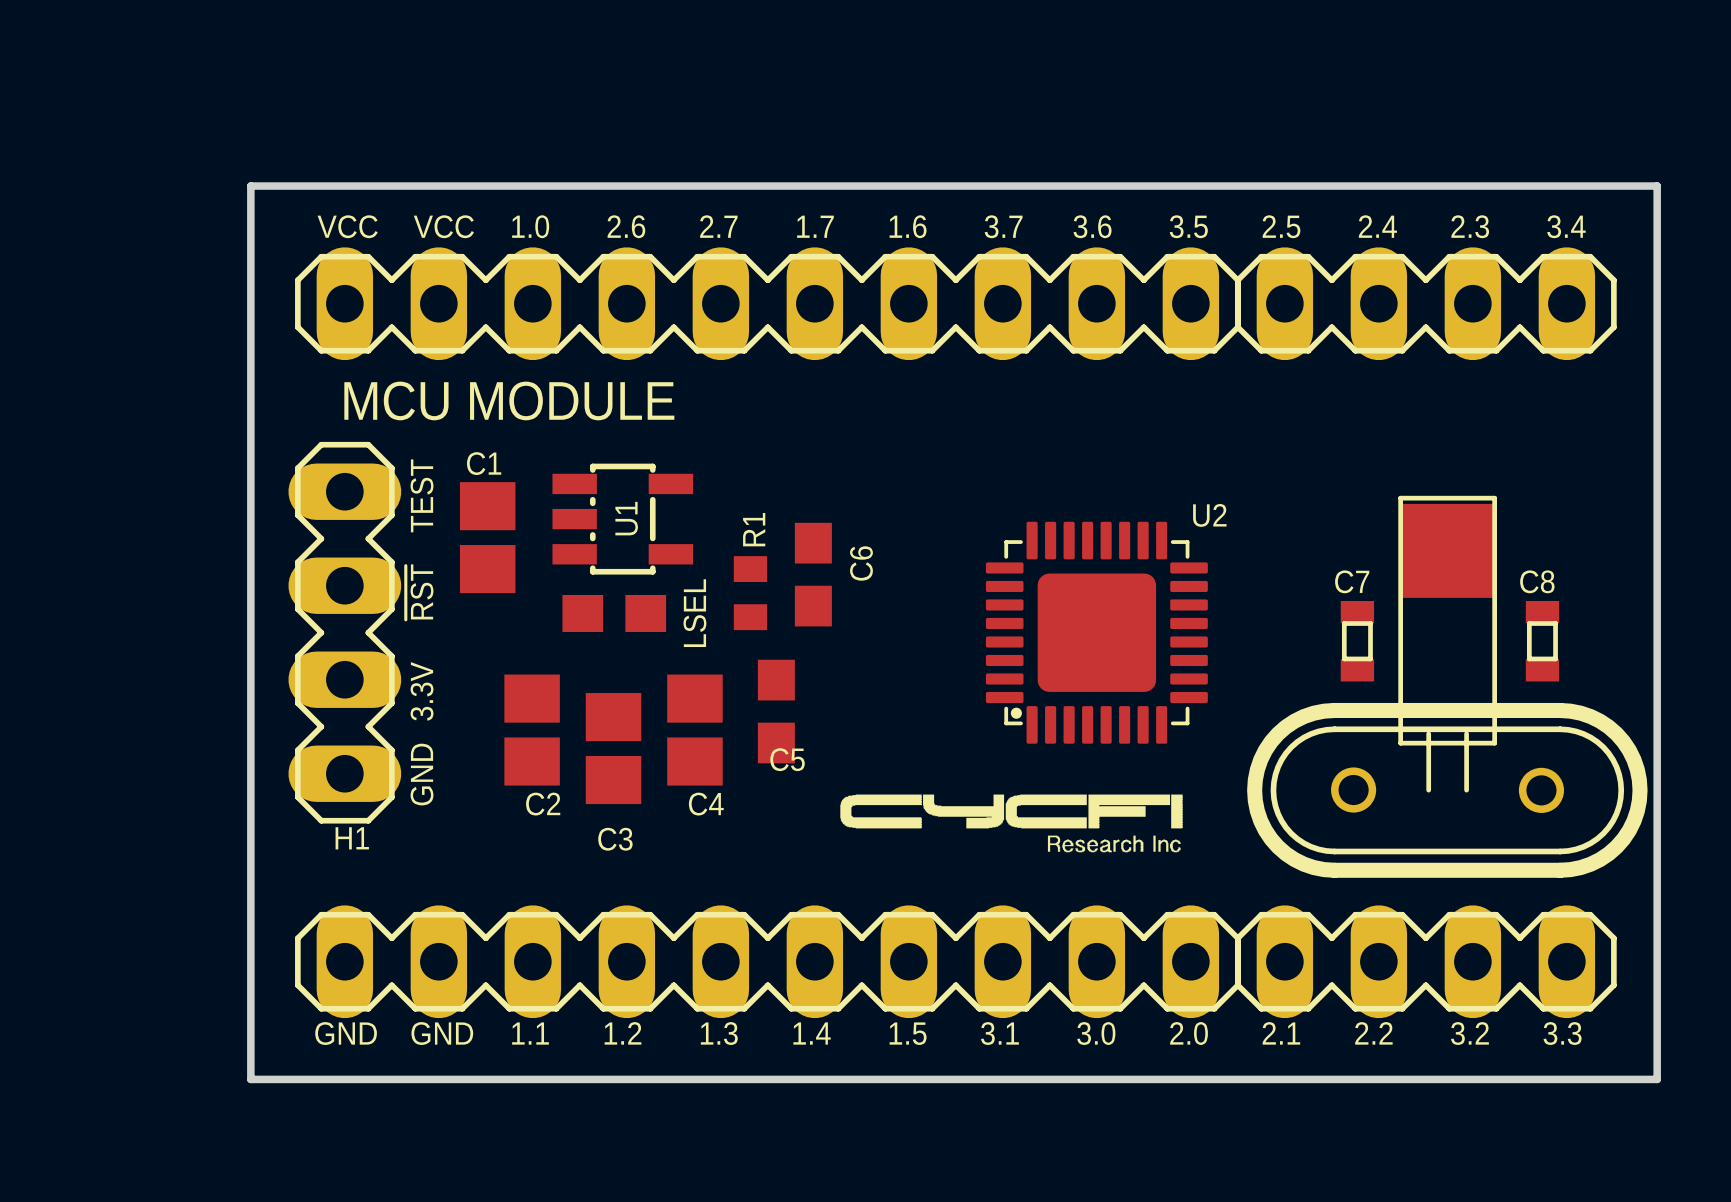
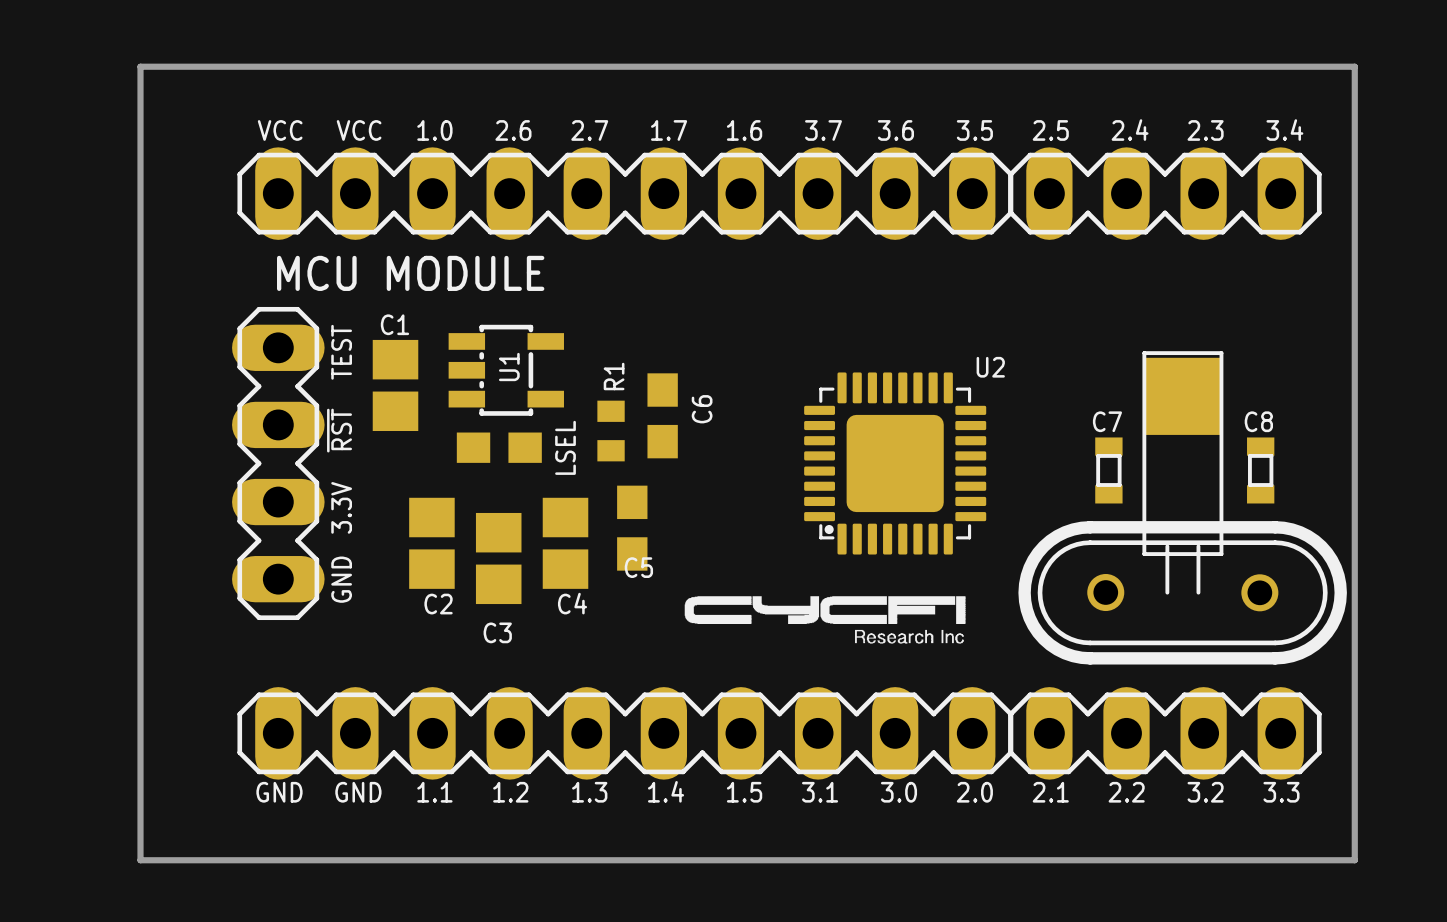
board edge: (1657, 186) (250, 186) (250, 1079) (1657, 1079) -> (1354, 97) (1354, 66) (140, 66) (140, 860) (1354, 860) (1354, 829)
text: H1 (352, 838) -> none

